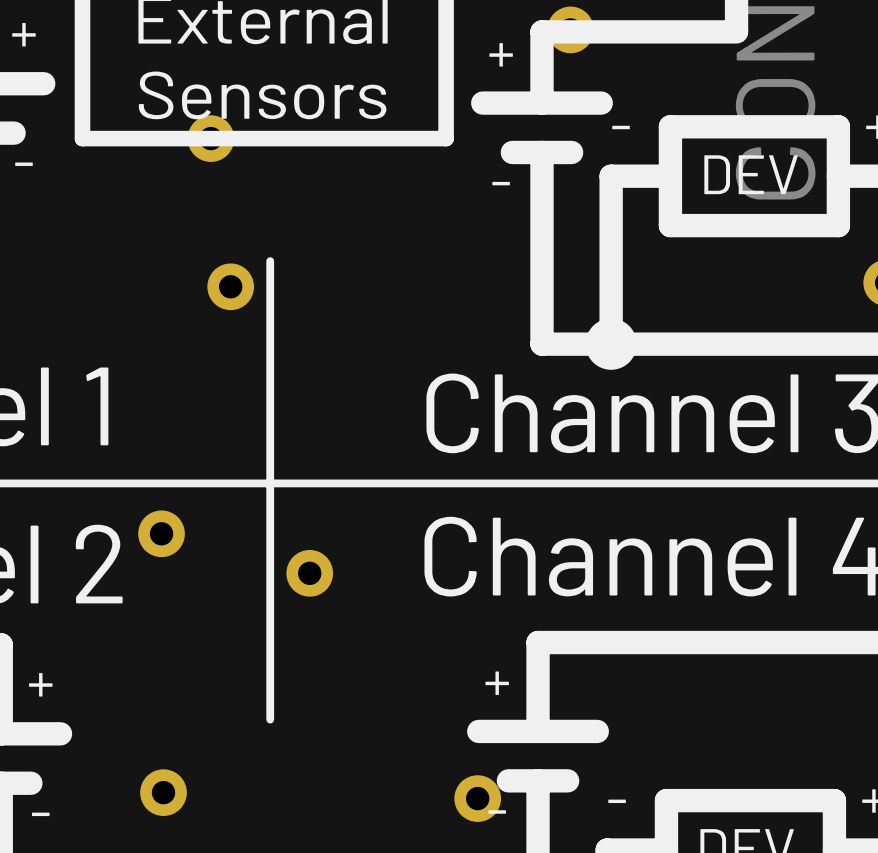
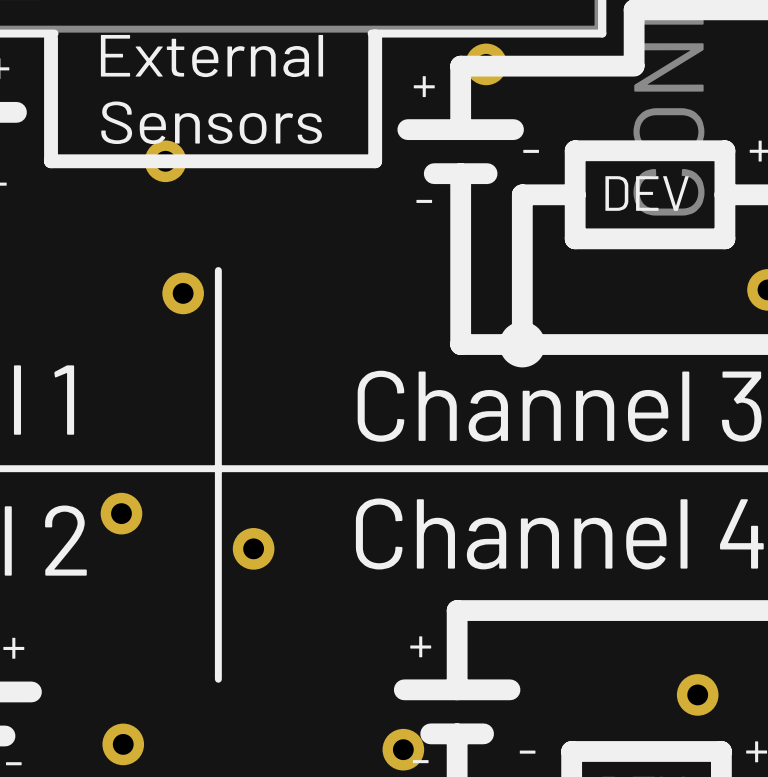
part: none -> (697, 694)

